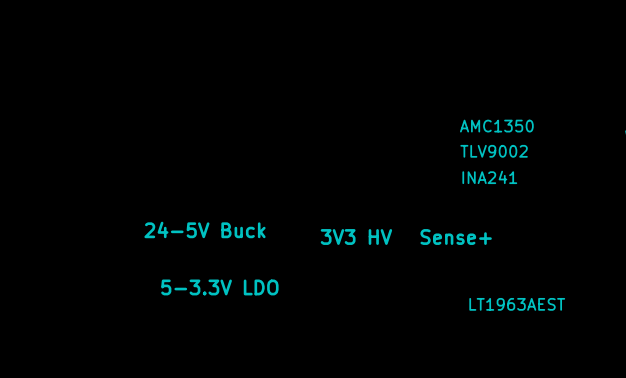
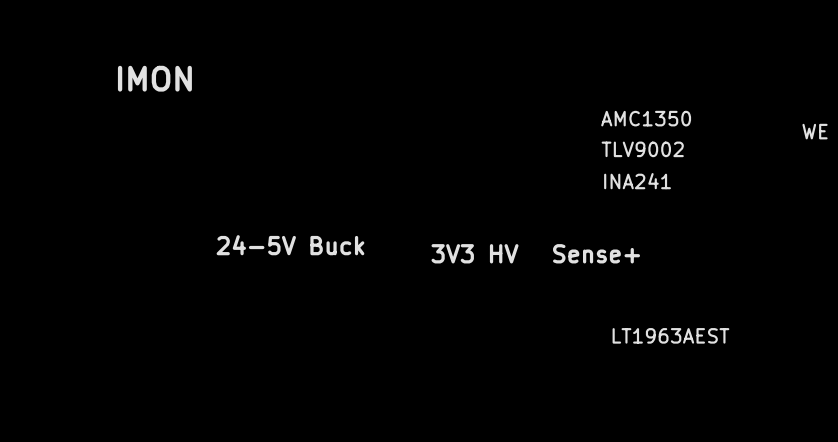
text: none -> IMON (154, 78)
text: 5-3.3V LDO (219, 287) -> none

